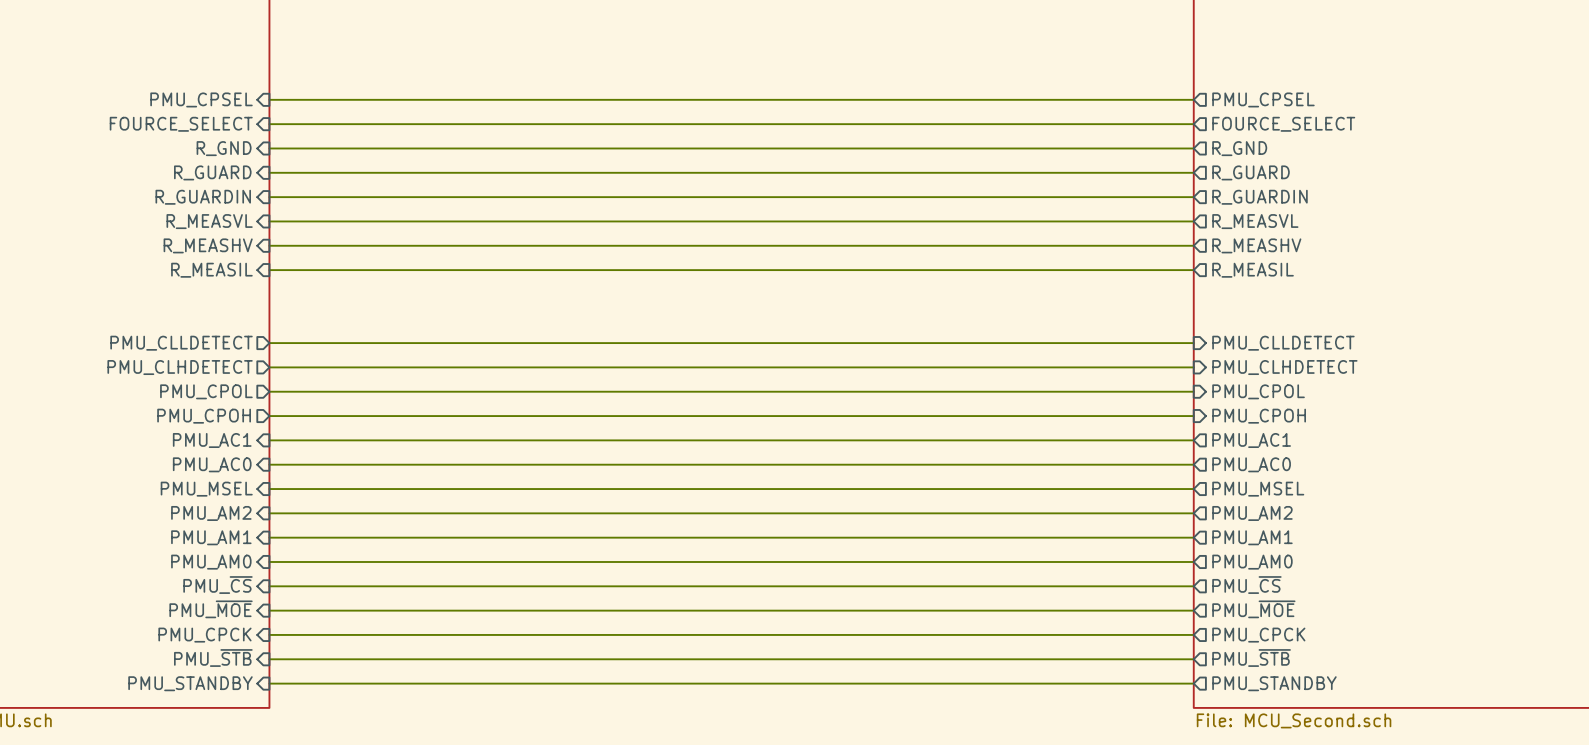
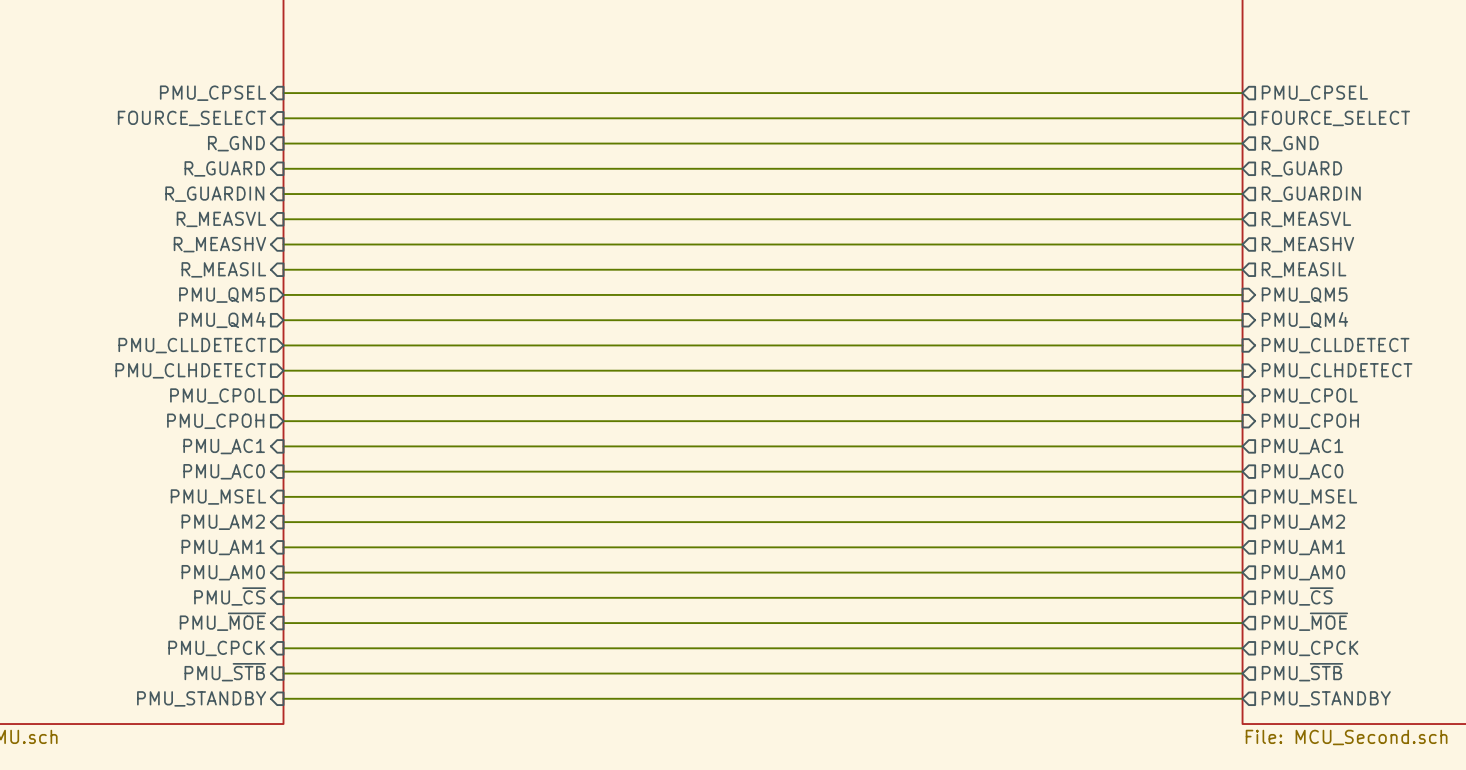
sheet pin: none -> PMU_QM5 (222, 295)
wire: none -> (283, 294) (1242, 294)
sheet pin: none -> PMU_QM5 (1304, 295)
sheet pin: none -> PMU_QM4 (222, 320)
wire: none -> (283, 320) (1242, 320)
sheet pin: none -> PMU_QM4 (1304, 320)

